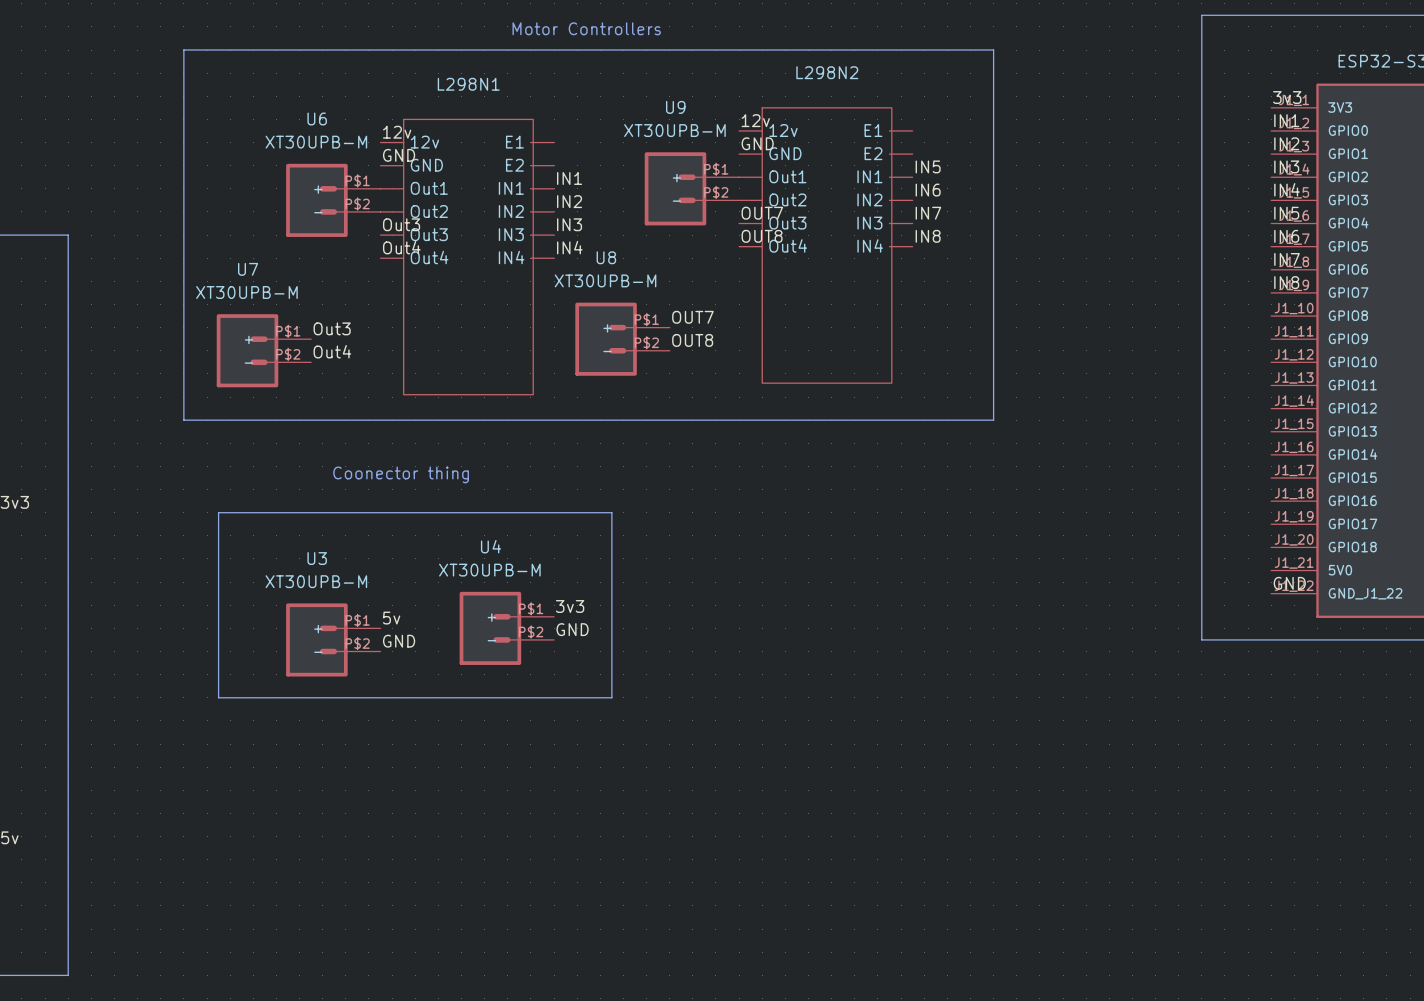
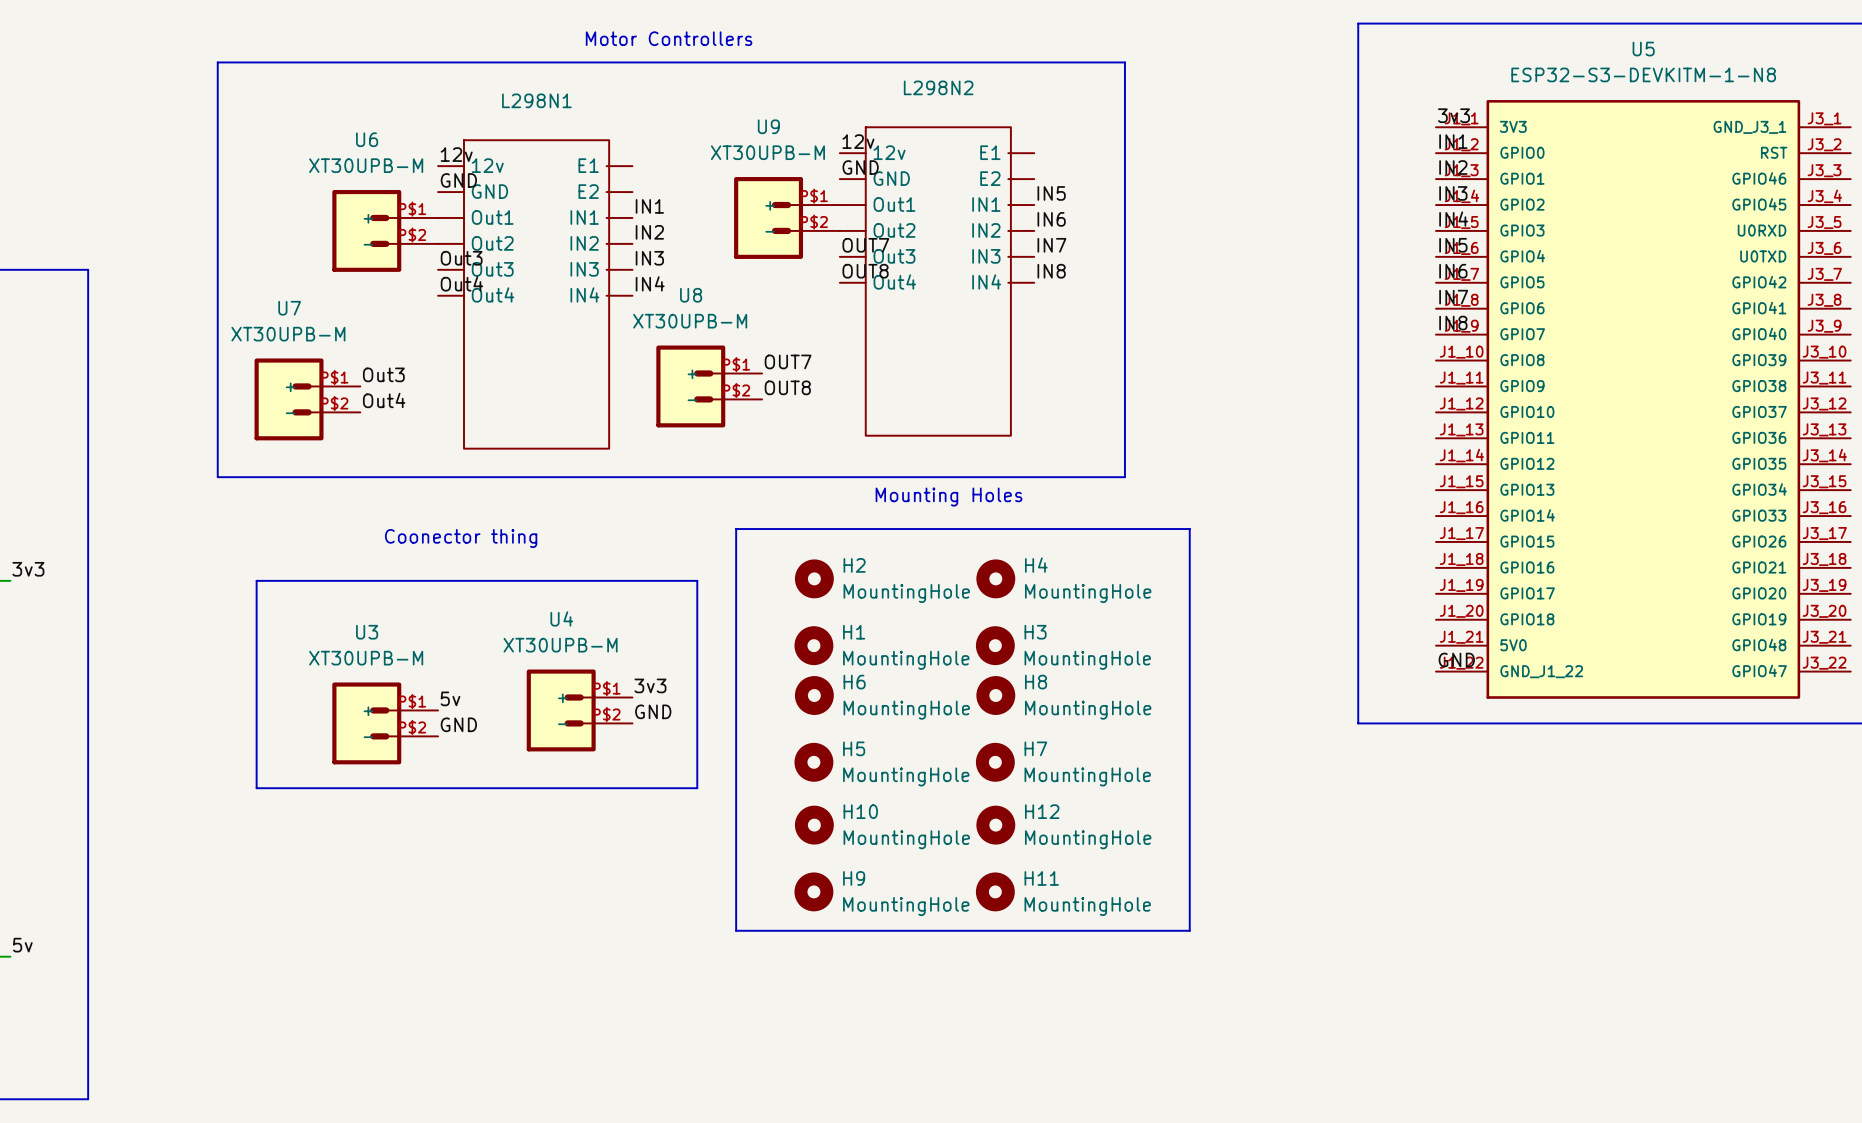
text: none -> Mounting Holes (949, 497)
line: none -> (736, 529) (1189, 529) (1189, 930) (736, 930) (736, 529)
H2: none -> MountingHole (814, 578)
H4: none -> MountingHole (995, 578)
H1: none -> MountingHole (813, 645)
H3: none -> MountingHole (995, 645)
H6: none -> MountingHole (814, 695)
H8: none -> MountingHole (995, 695)
H5: none -> MountingHole (813, 762)
H7: none -> MountingHole (995, 762)
H10: none -> MountingHole (814, 825)
H12: none -> MountingHole (995, 825)
H9: none -> MountingHole (813, 891)
H11: none -> MountingHole (995, 891)

